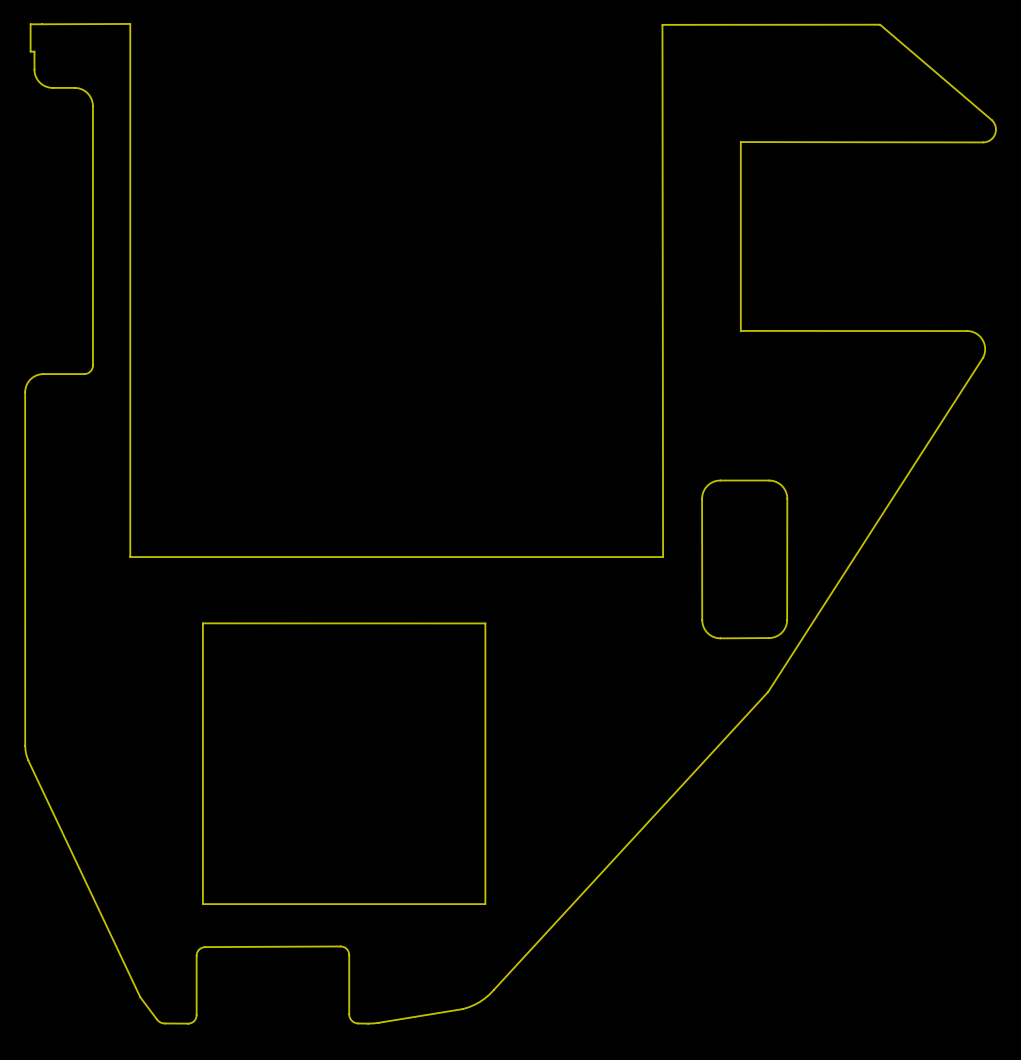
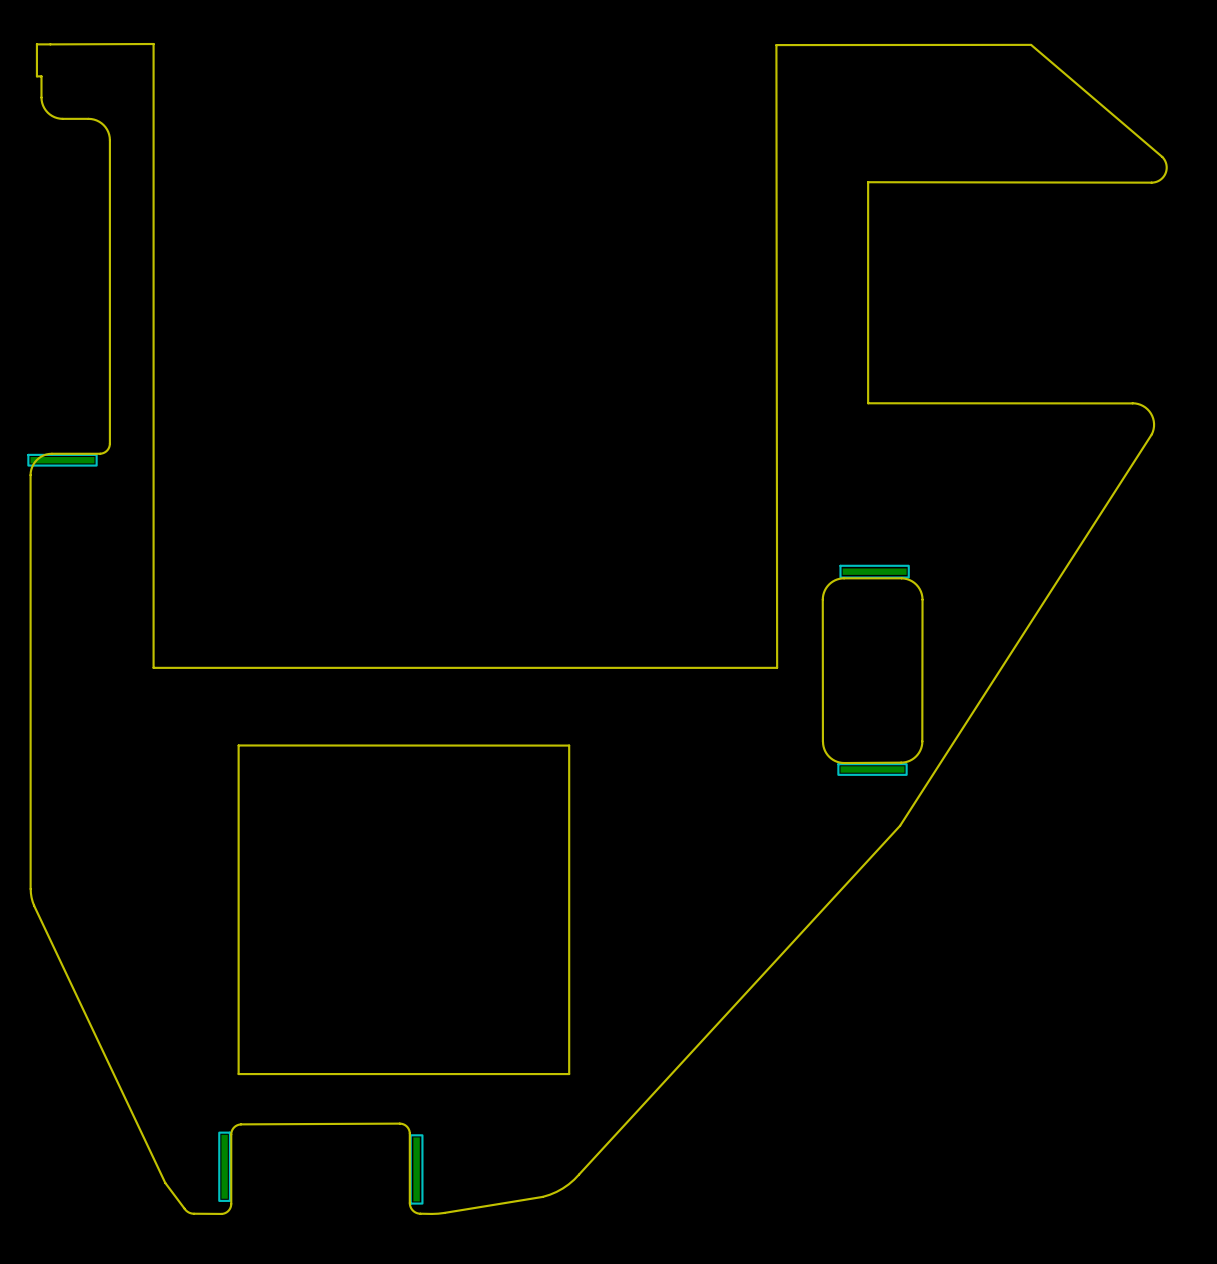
part: none -> (62, 460)
part: none -> (874, 571)
part: none -> (872, 769)
part: none -> (224, 1166)
part: none -> (416, 1169)

